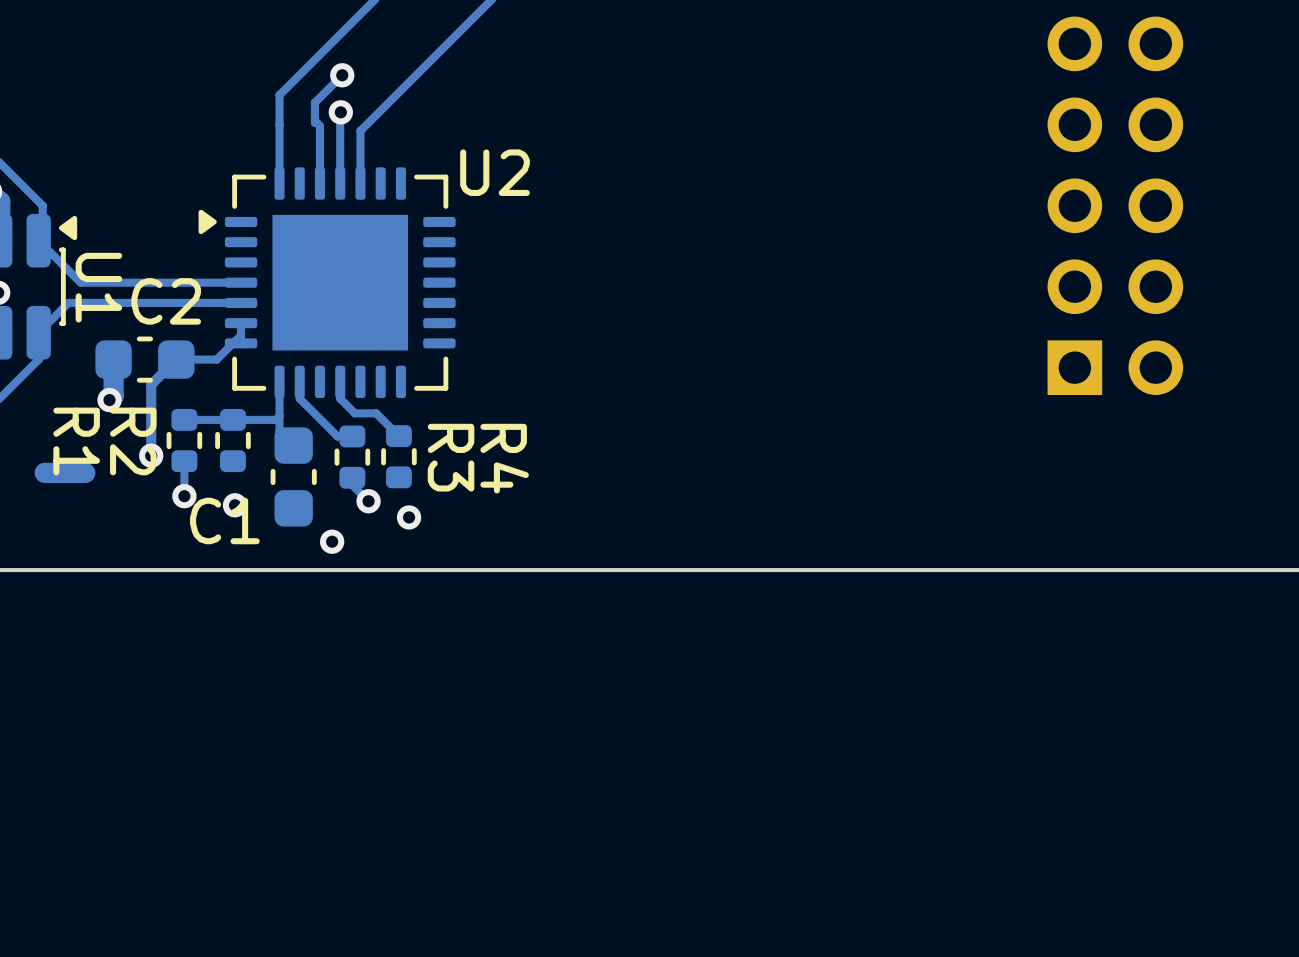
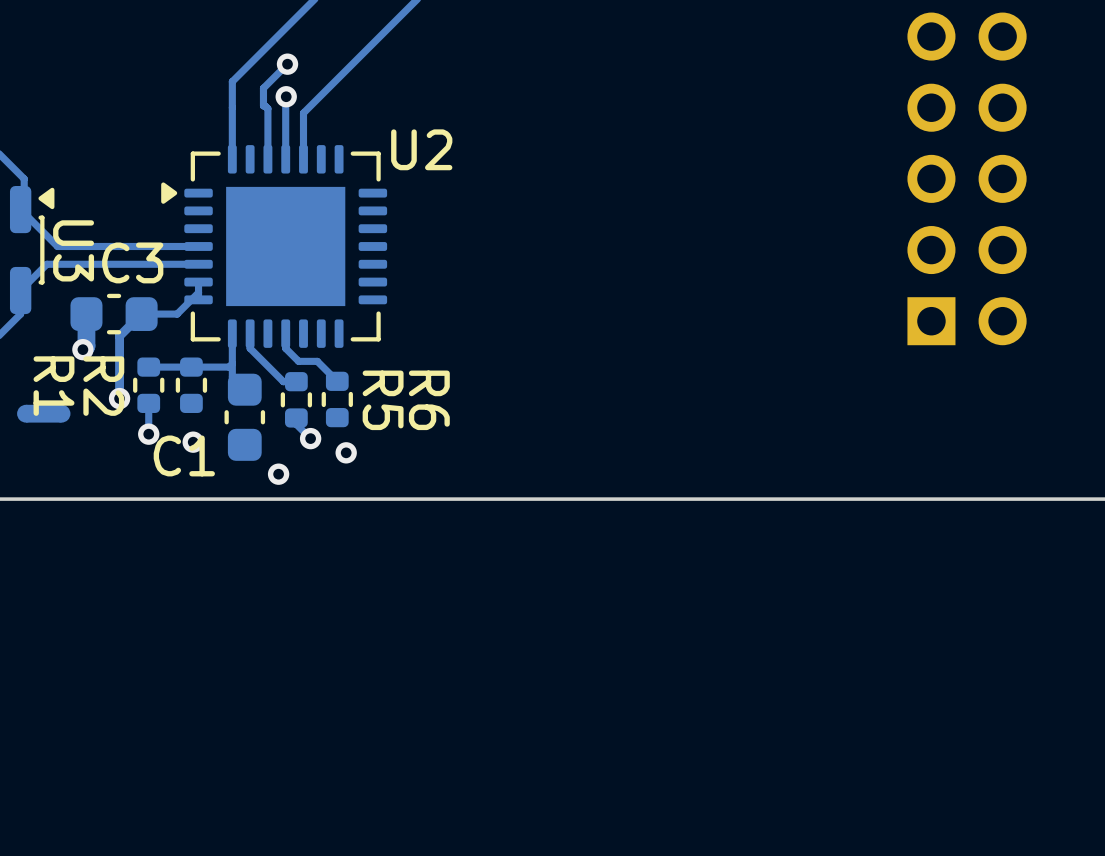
U1 name: U1 (98, 287) -> U3 (73, 250)
C2 name: C2 (166, 301) -> C3 (132, 262)
R3 name: R3 (451, 457) -> R5 (383, 400)
R4 name: R4 (504, 458) -> R6 (429, 400)

